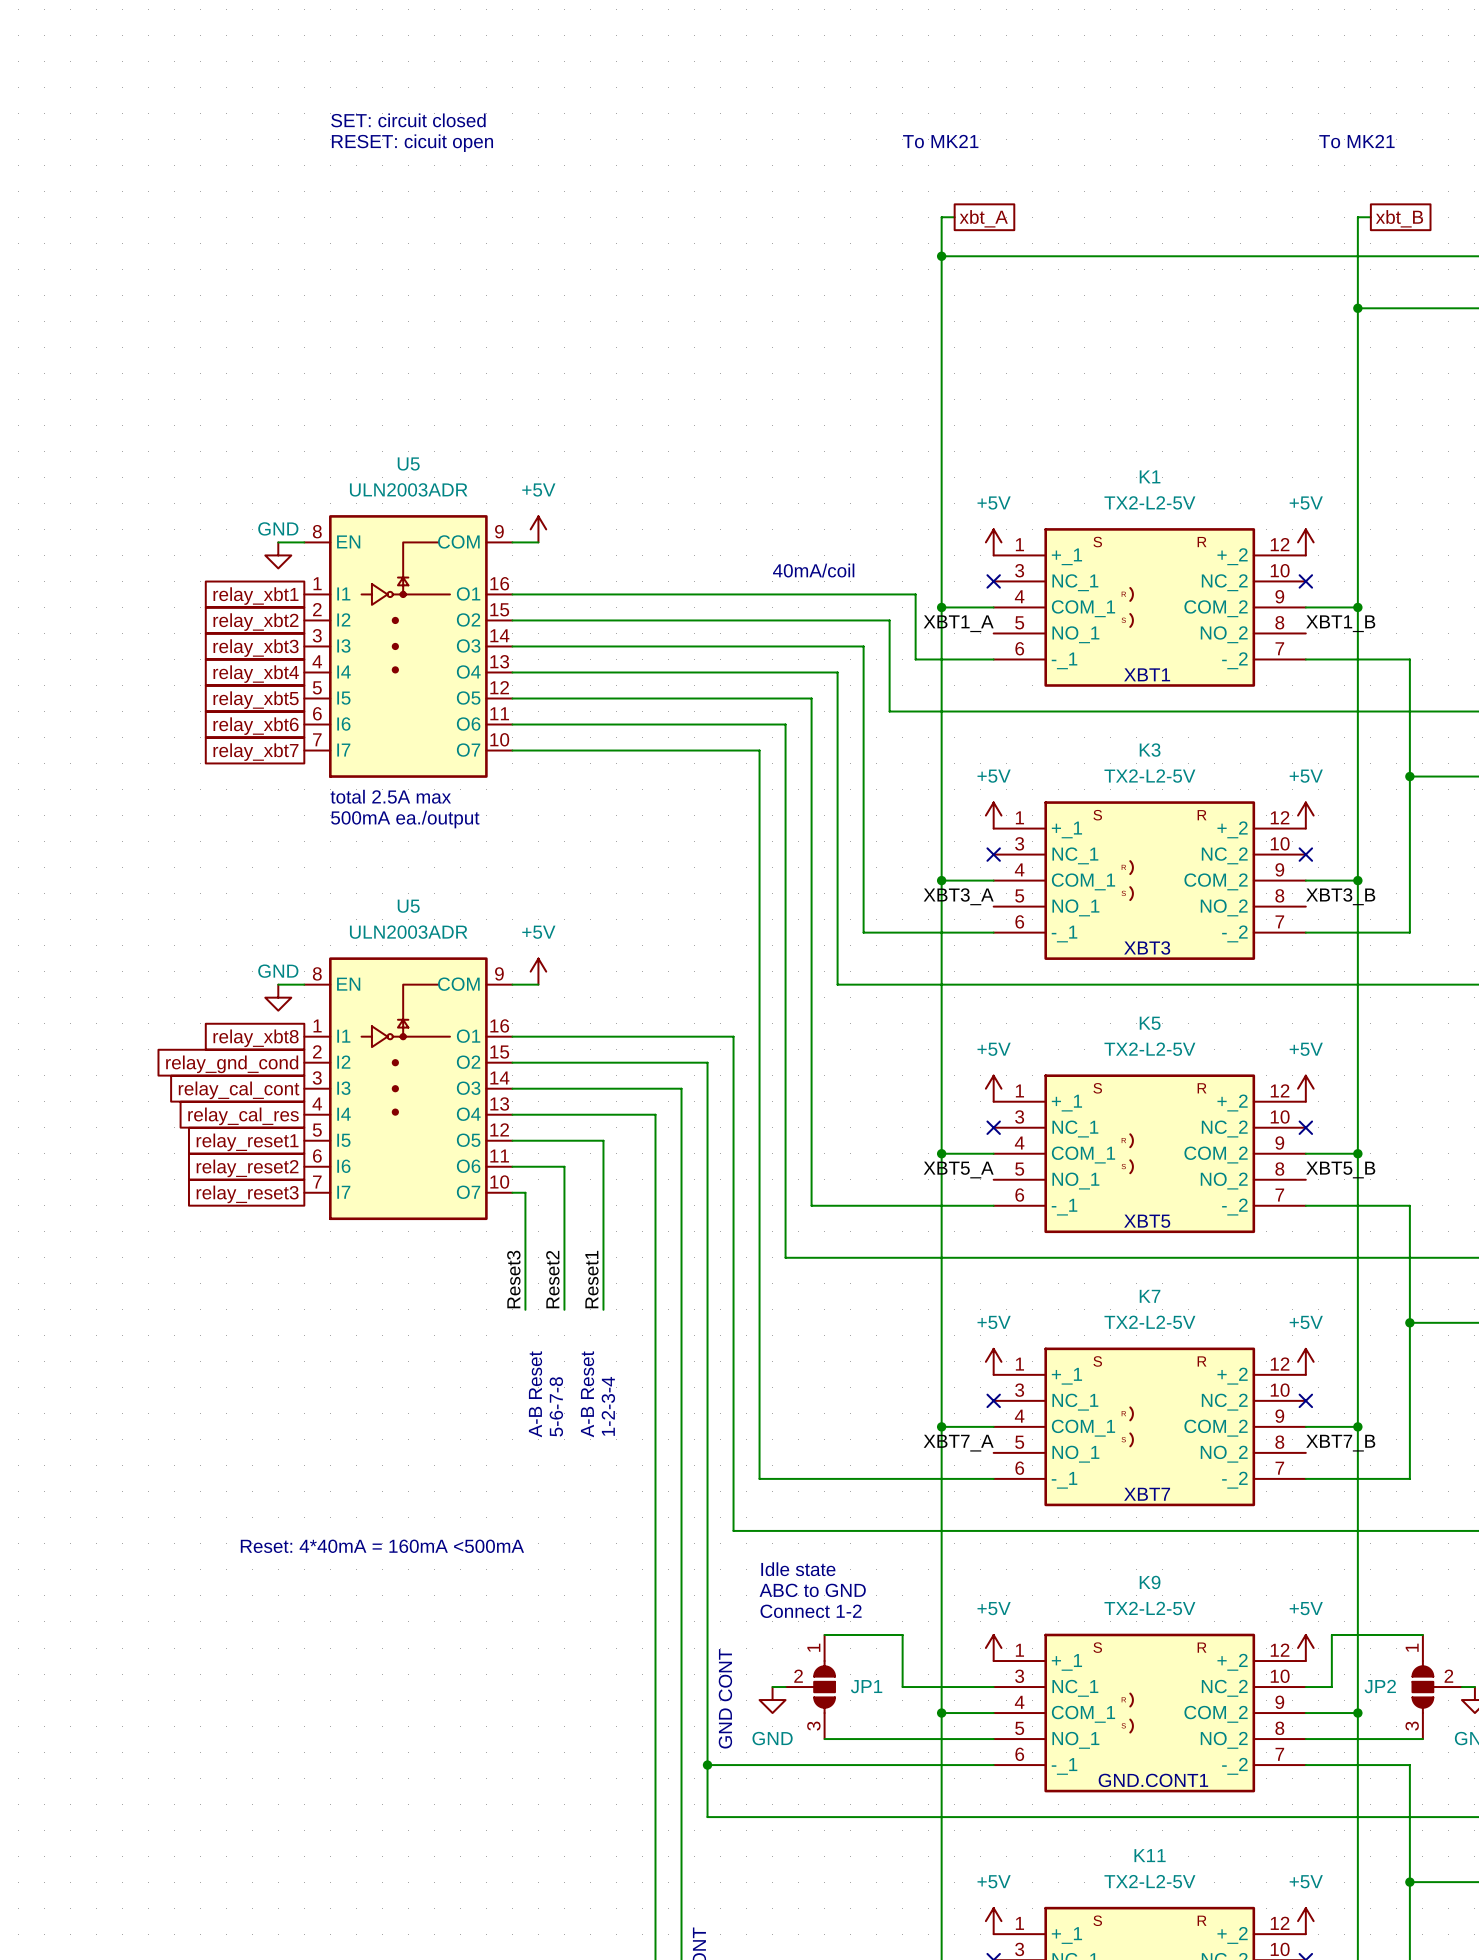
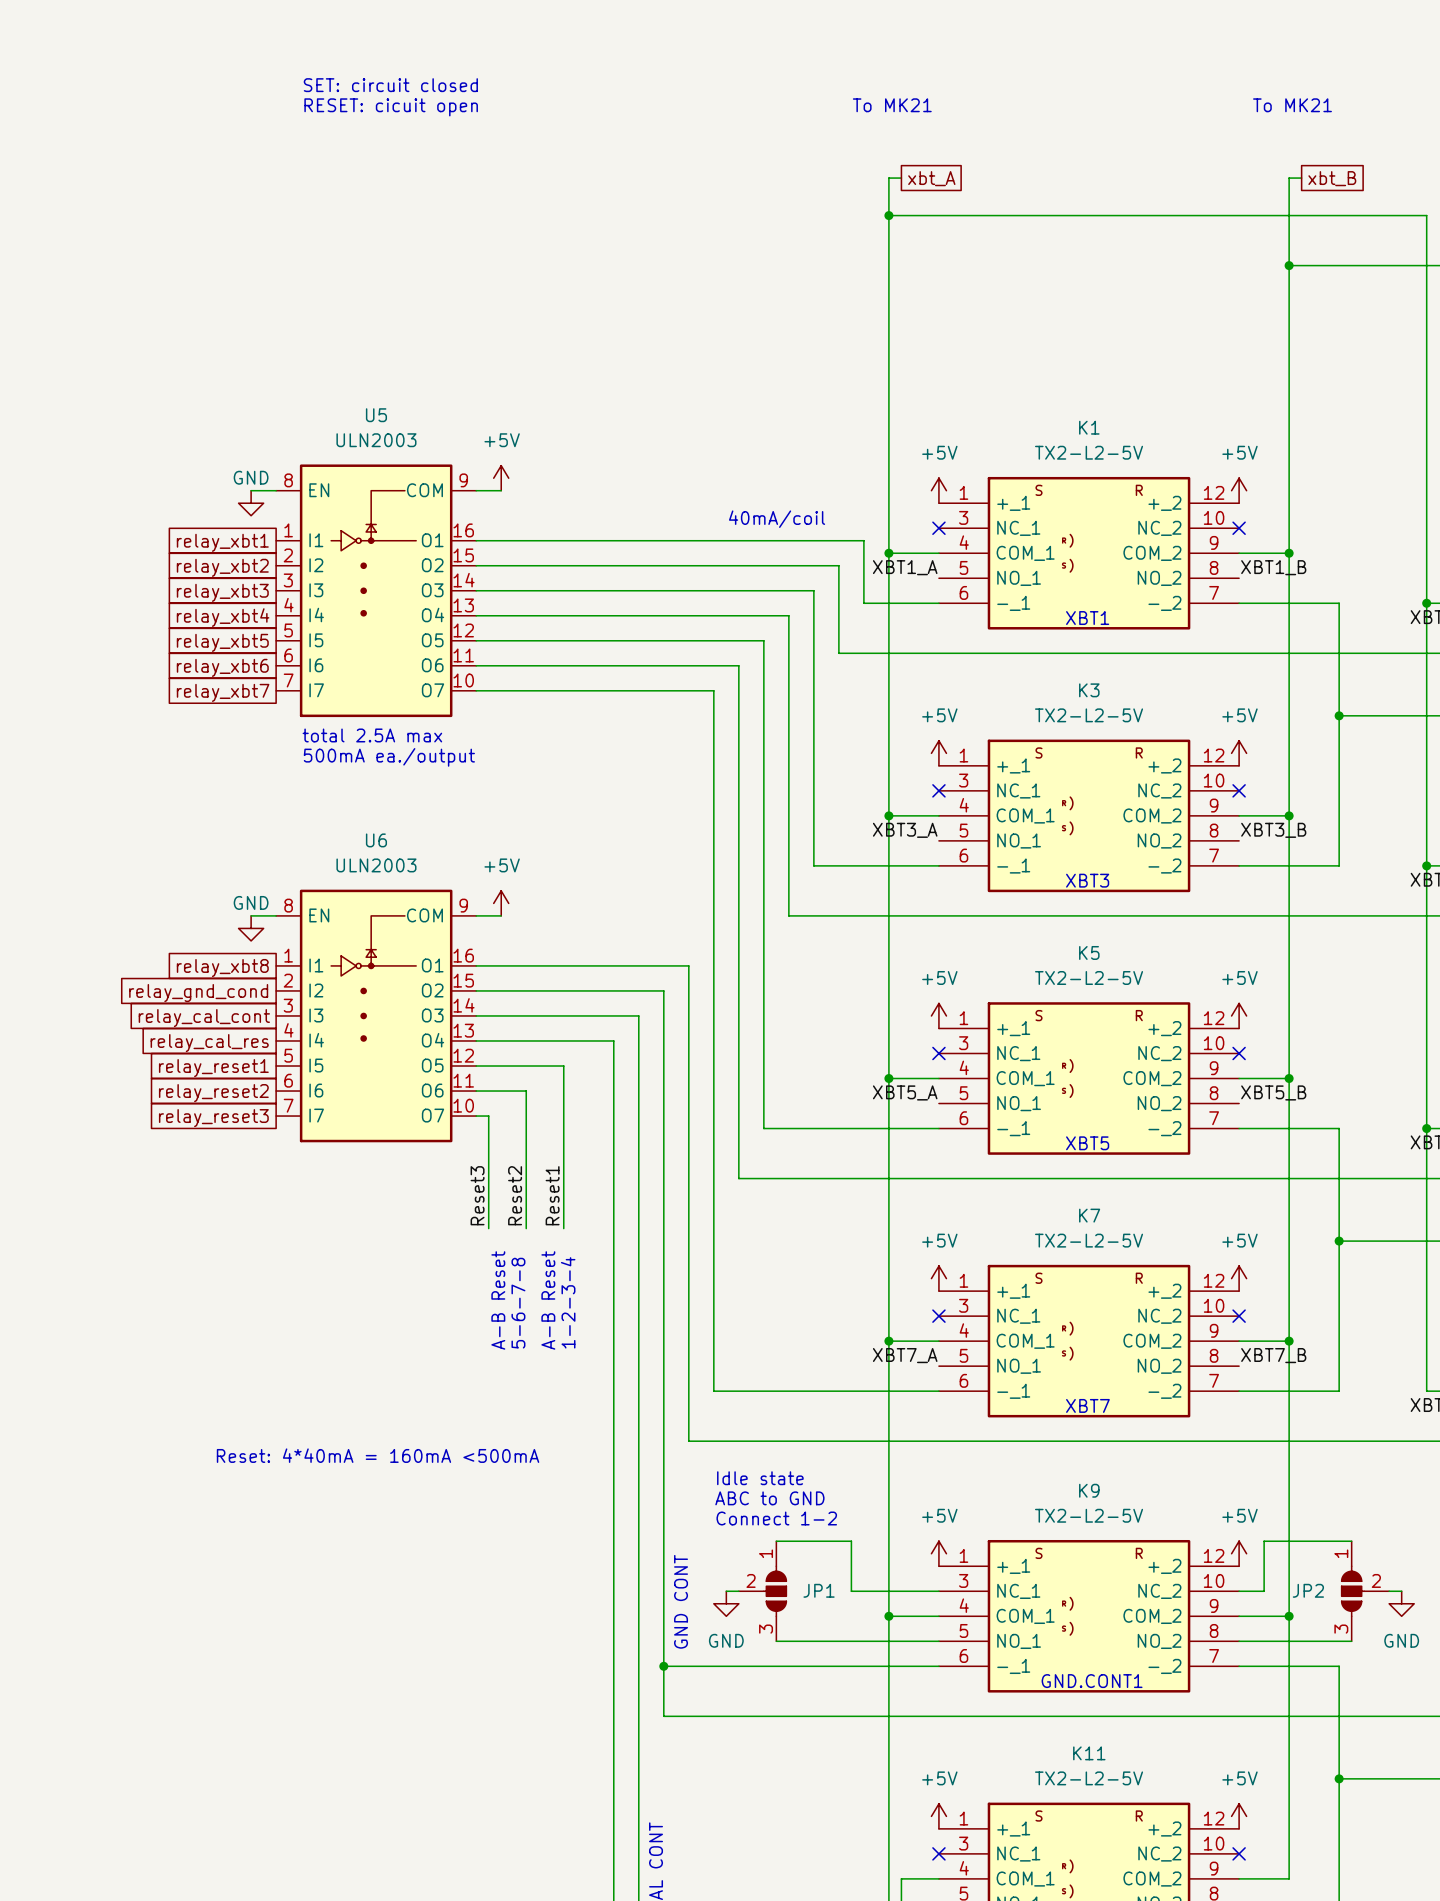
U5 value: ULN2003ADR (408, 489) -> ULN2003 (376, 440)
U5 name: U5 (408, 906) -> U6 (376, 840)
U5 value: ULN2003ADR (408, 932) -> ULN2003 (376, 865)

